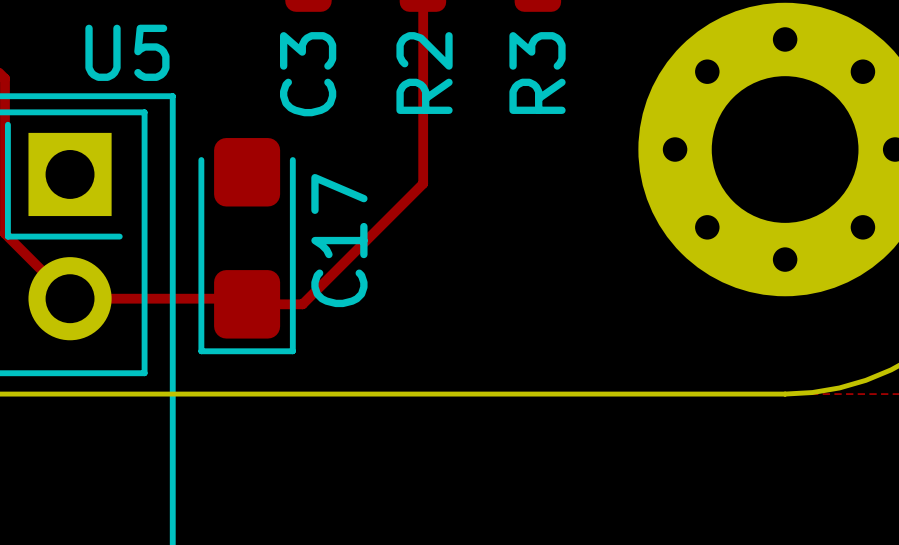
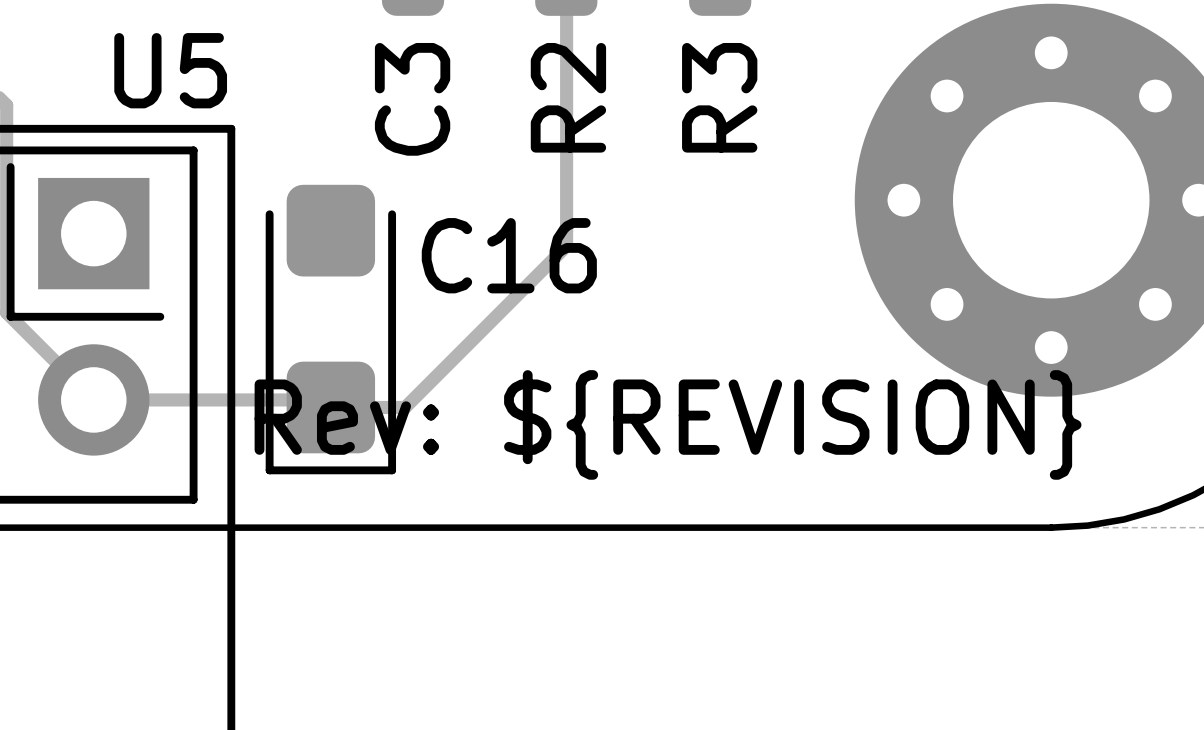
C17 name: C17 (339, 240) -> C16 (509, 255)
text: none -> Rev: ${REVISION} (668, 424)

